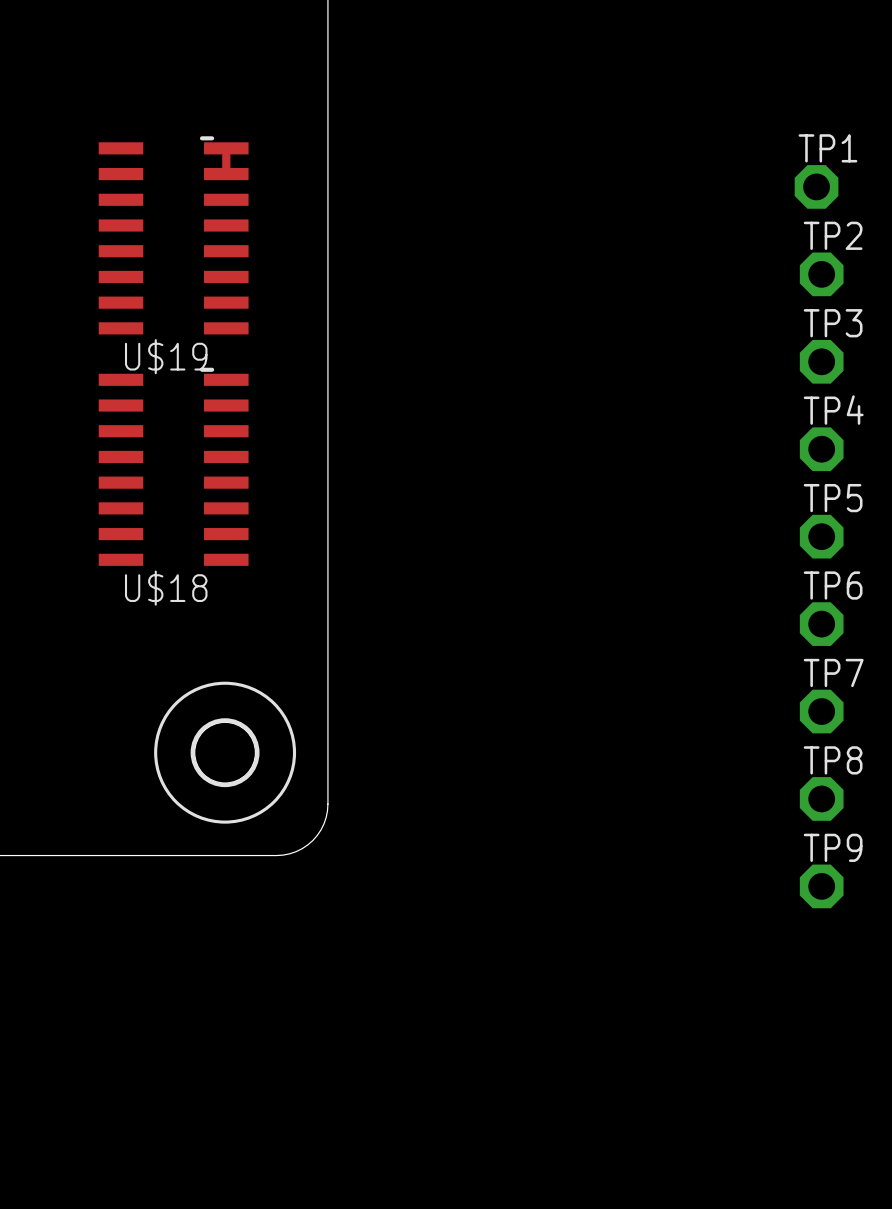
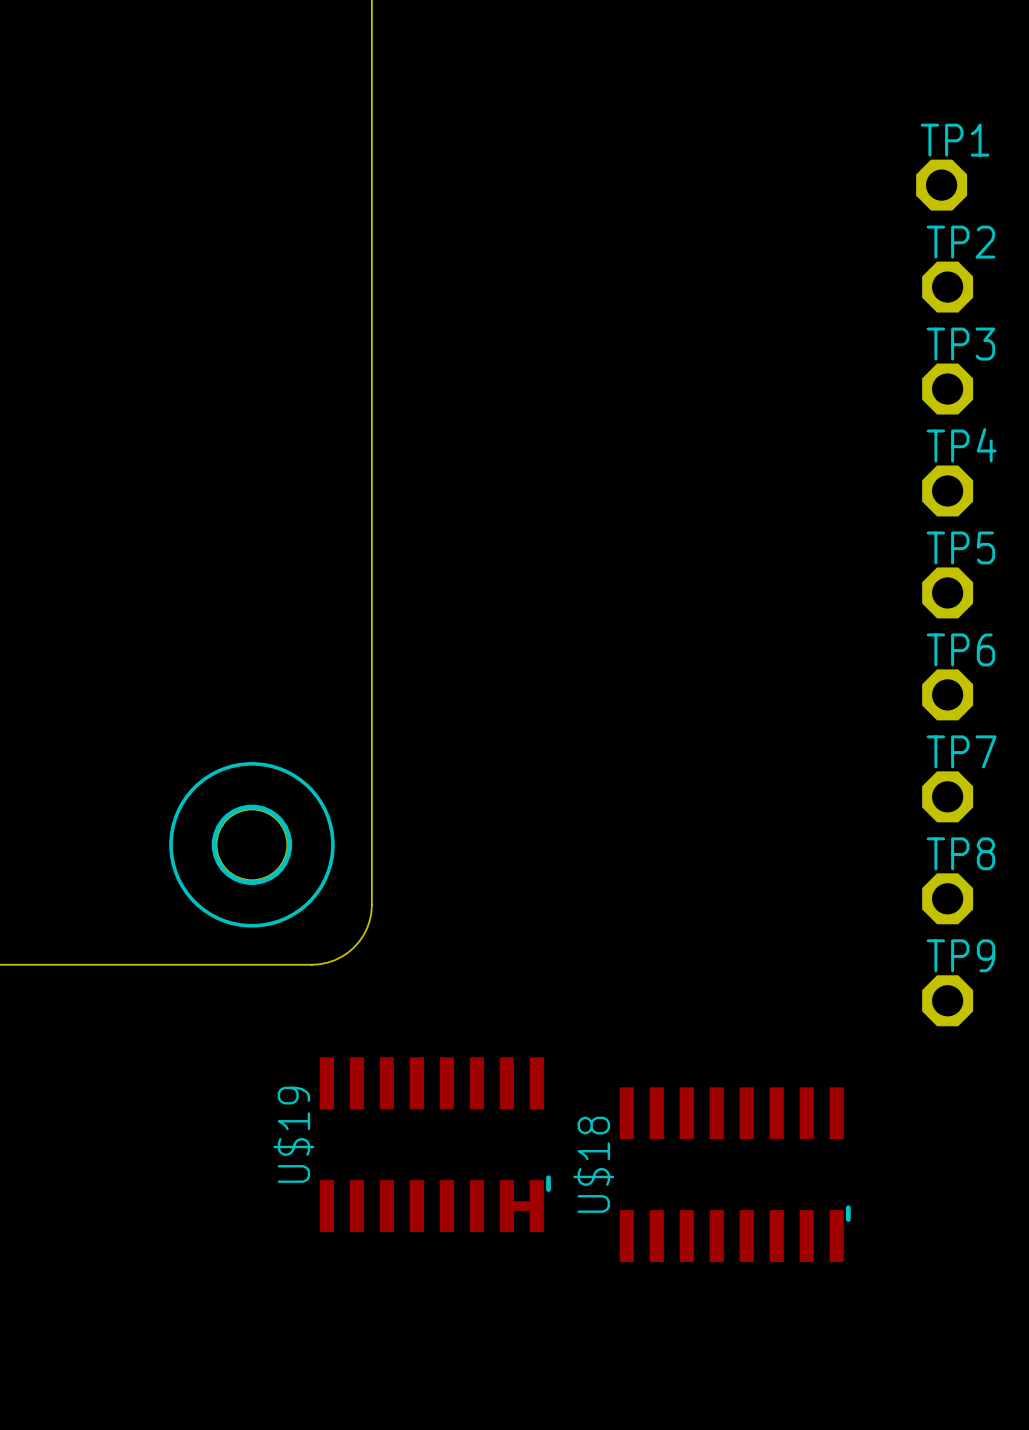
top track: (226, 148) (226, 174) -> none
U$19 rotation: 0° (173, 235) -> 90° clockwise (435, 1144)
U$19 position: (173, 235) -> (435, 1144)
U$18 rotation: 0° (173, 466) -> 90° clockwise (735, 1174)
U$18 position: (173, 466) -> (735, 1174)
top track: none -> (506, 1206) (536, 1206)

